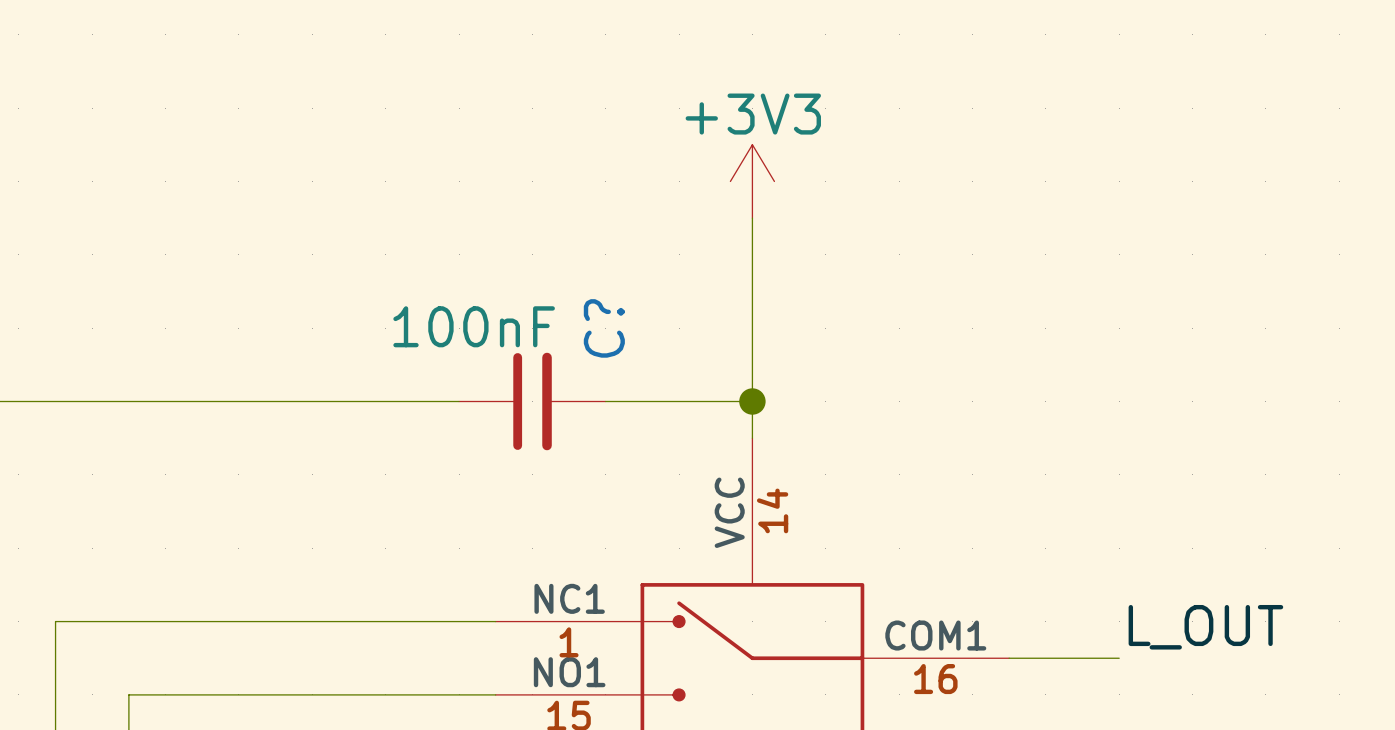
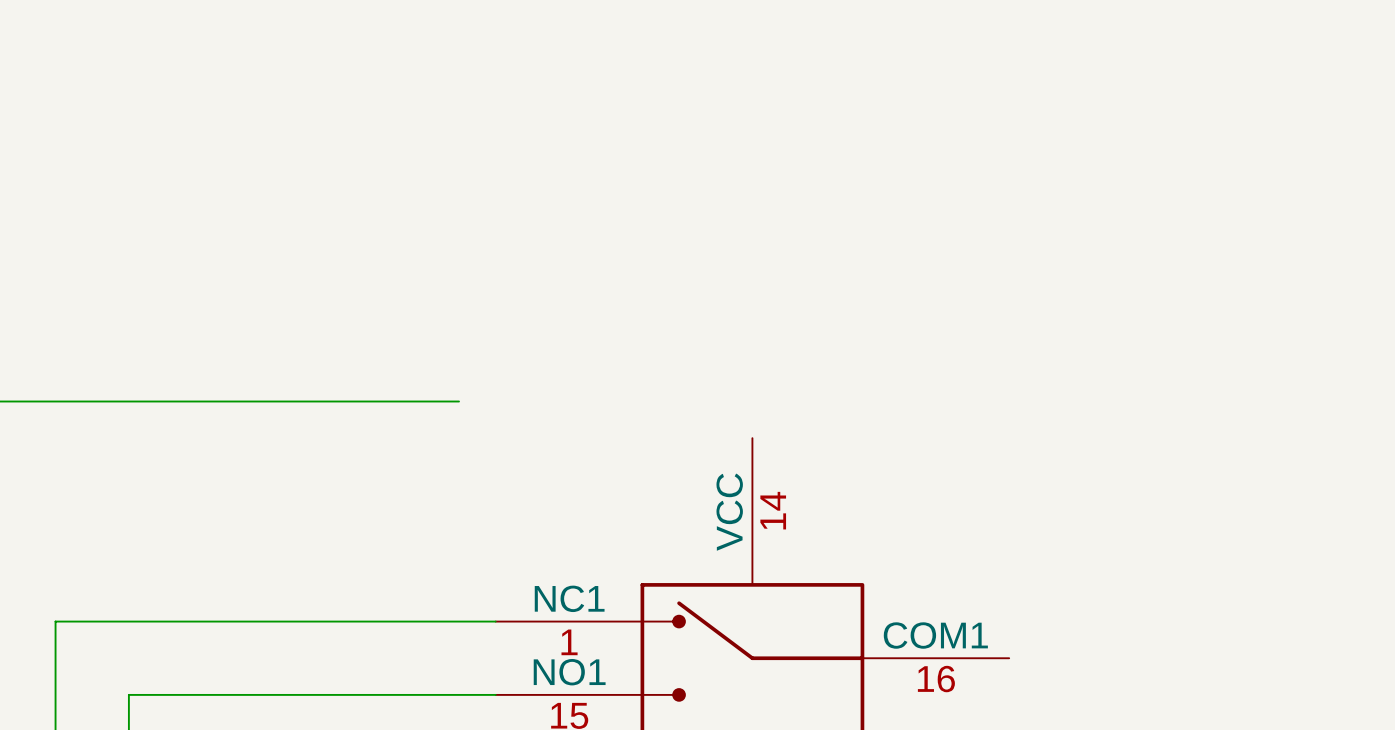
power symbol: +3V3 (752, 181) -> none
wire: (752, 218) (752, 438) -> none
C?: 100nF (532, 401) -> none
wire: (605, 401) (752, 401) -> none
junction: (752, 401) -> none
label: L_OUT (1205, 627) -> none
wire: (1009, 658) (1119, 658) -> none

